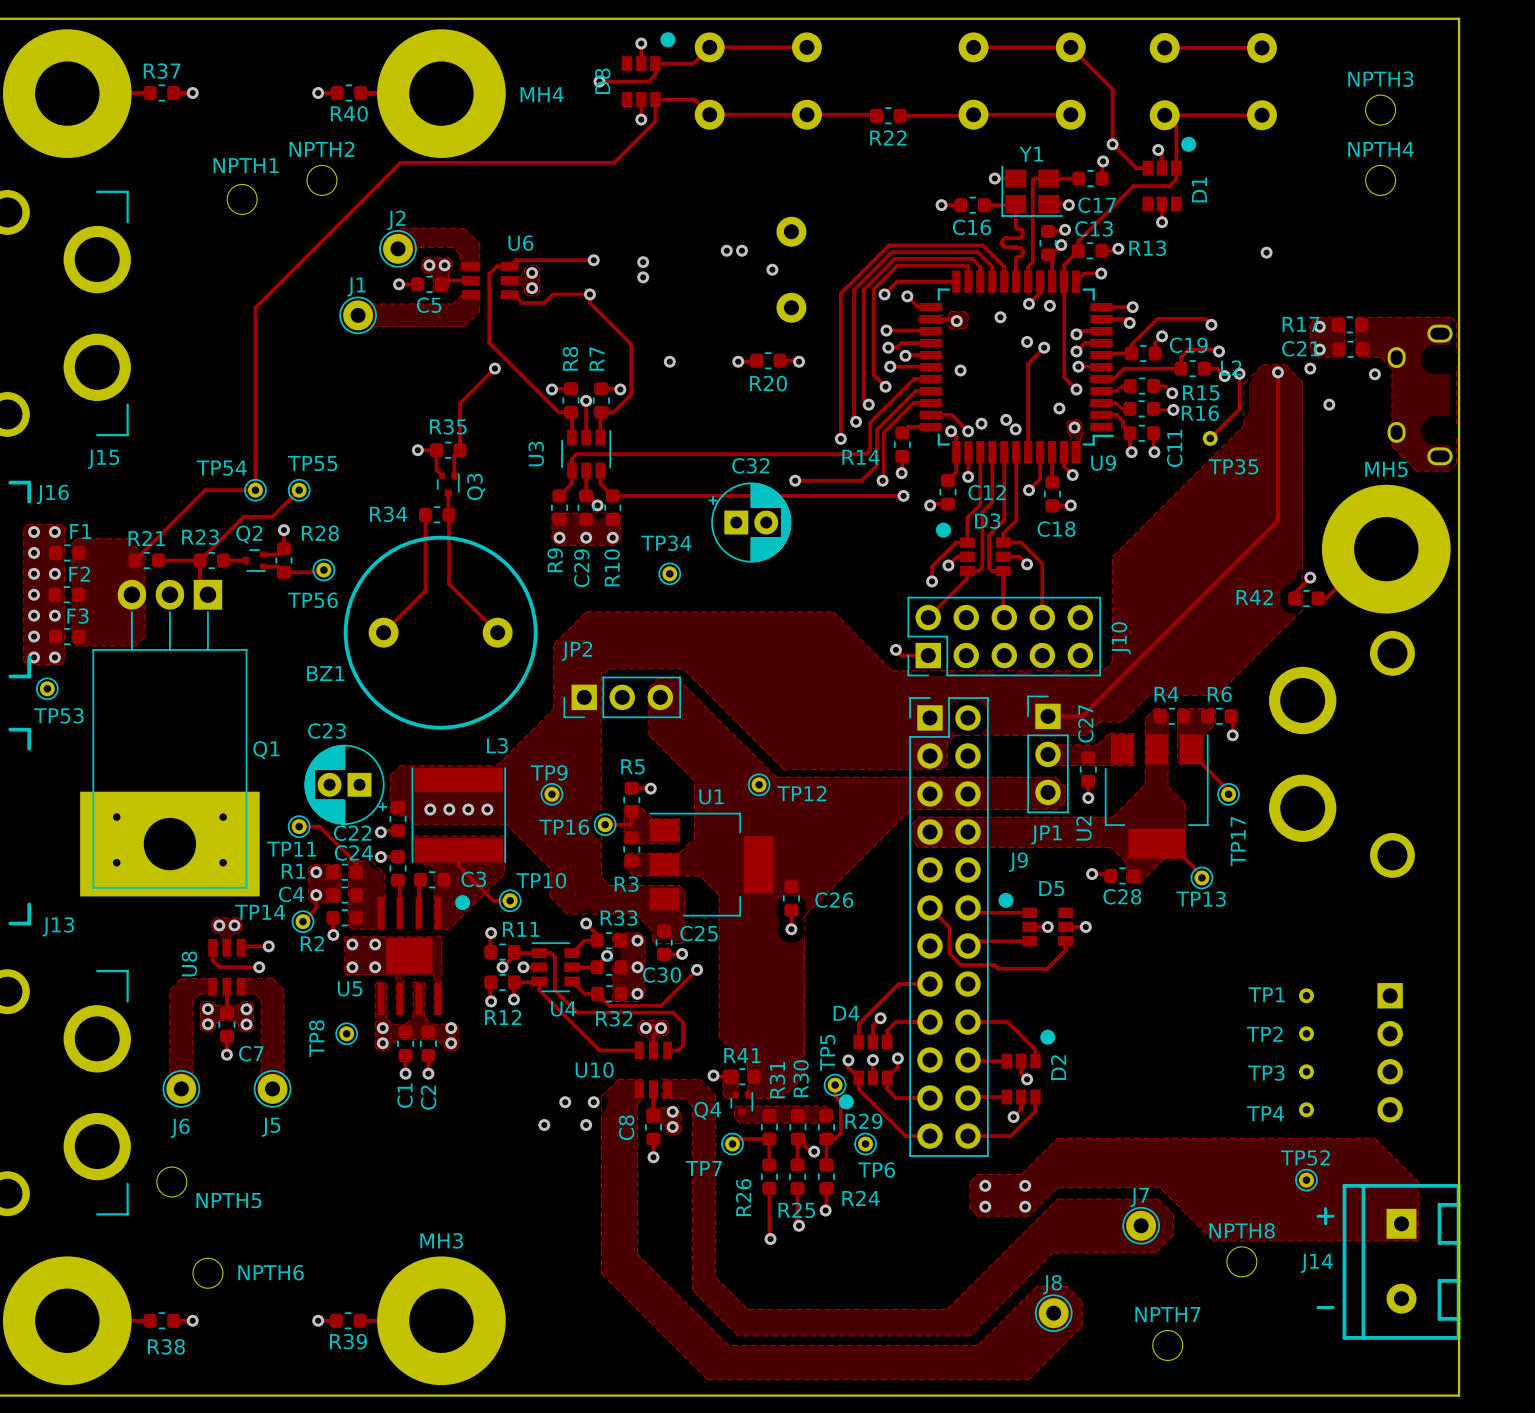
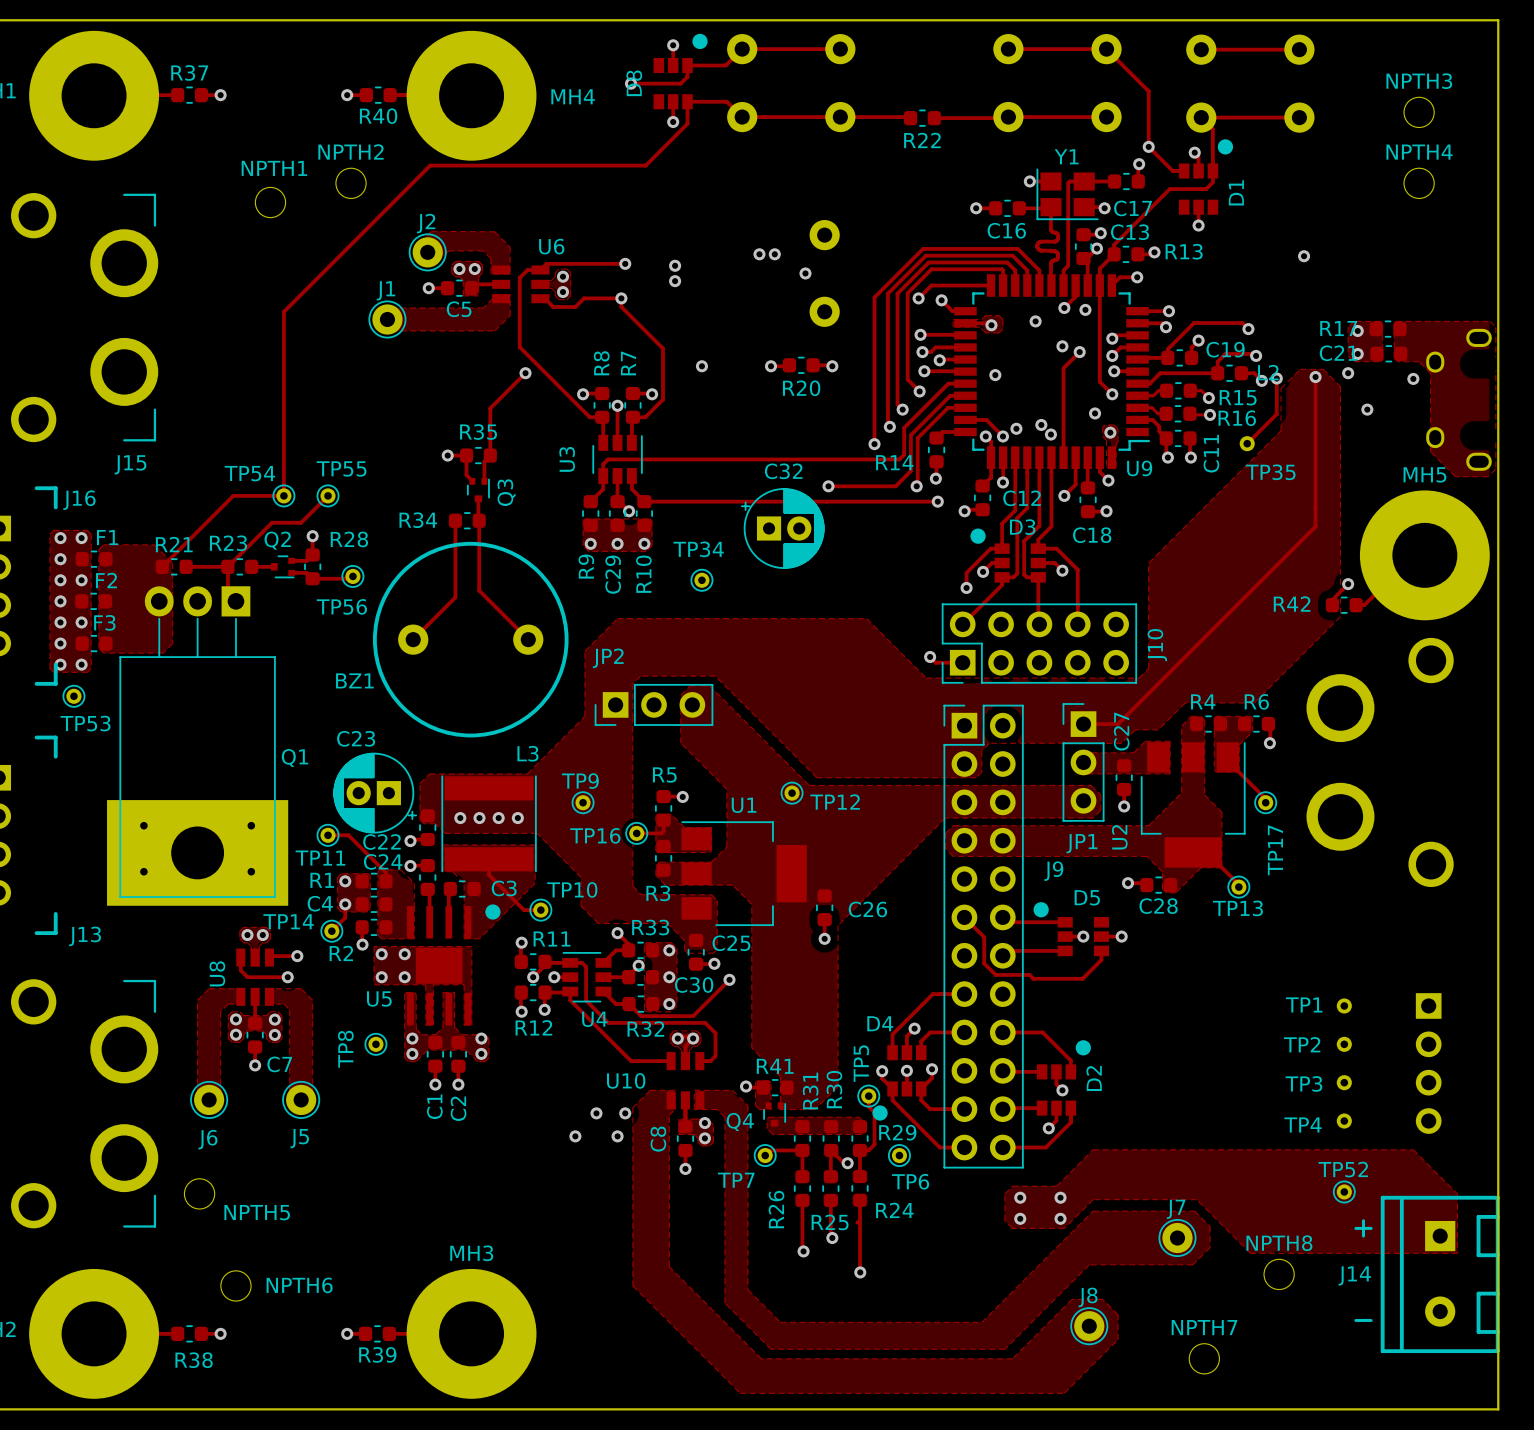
track: none -> (859, 1221) (860, 1272)
via position: (825, 1210) -> (860, 1272)

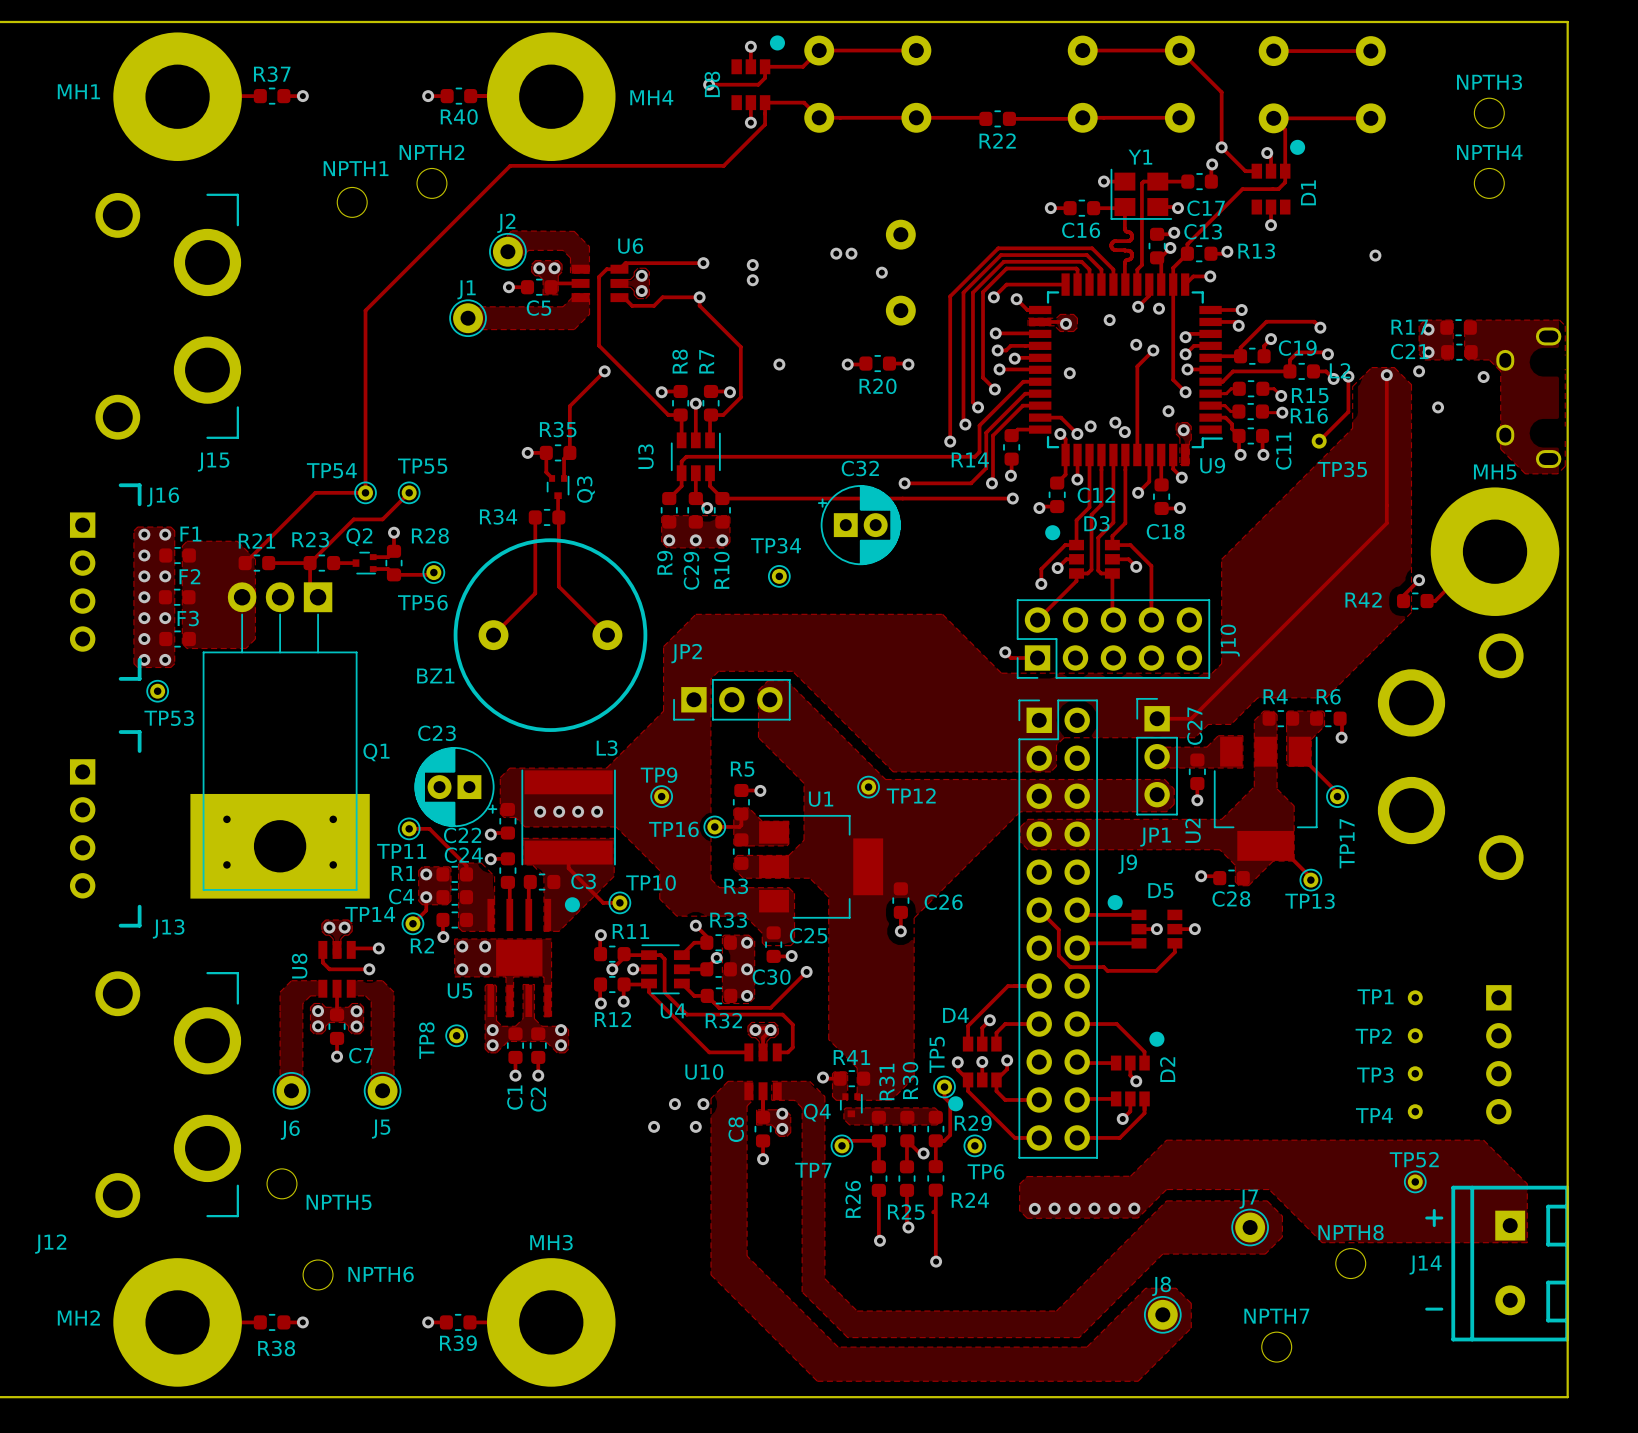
zone outline: (1056, 1186) (1012, 1186) (1004, 1193) (1004, 1220) (1012, 1228) (1064, 1228) -> (1130, 1176) (1027, 1176) (1019, 1184) (1019, 1210) (1027, 1218) (1138, 1218)
via: (1020, 1197) -> none
via: (1060, 1197) -> none
via: none -> (1054, 1208)
via: none -> (1034, 1208)
via: none -> (1074, 1208)
via: none -> (1114, 1208)

